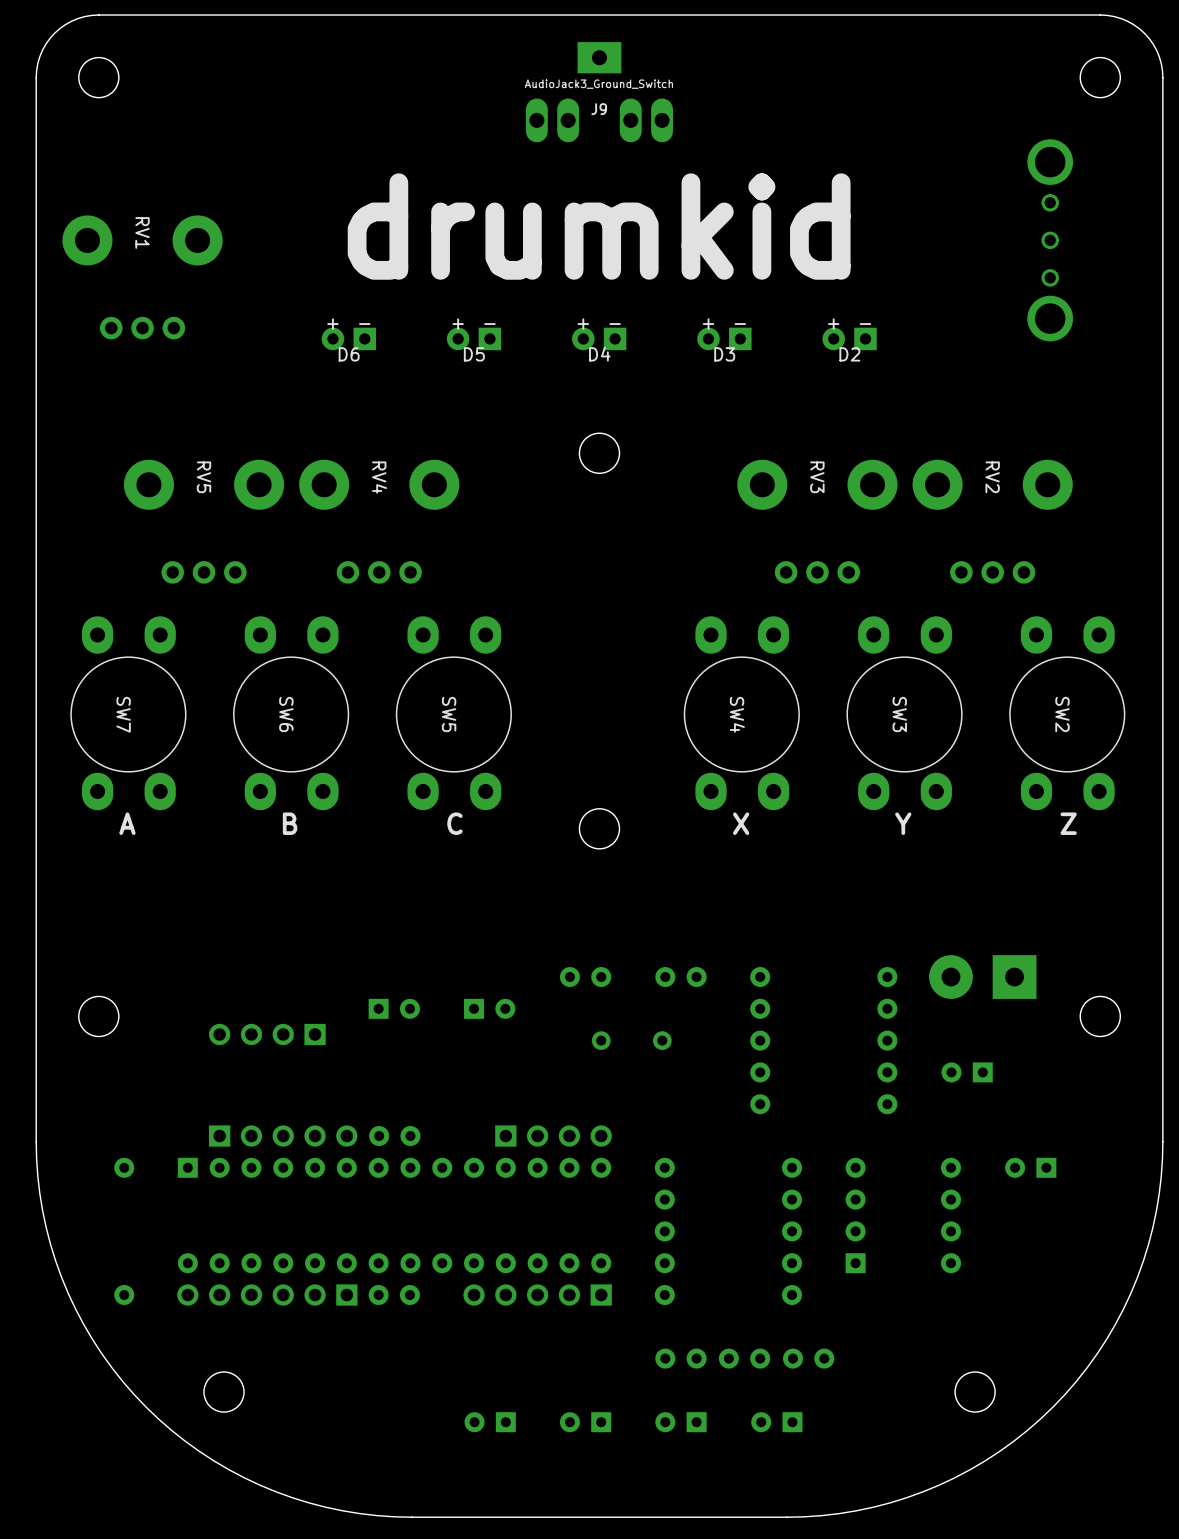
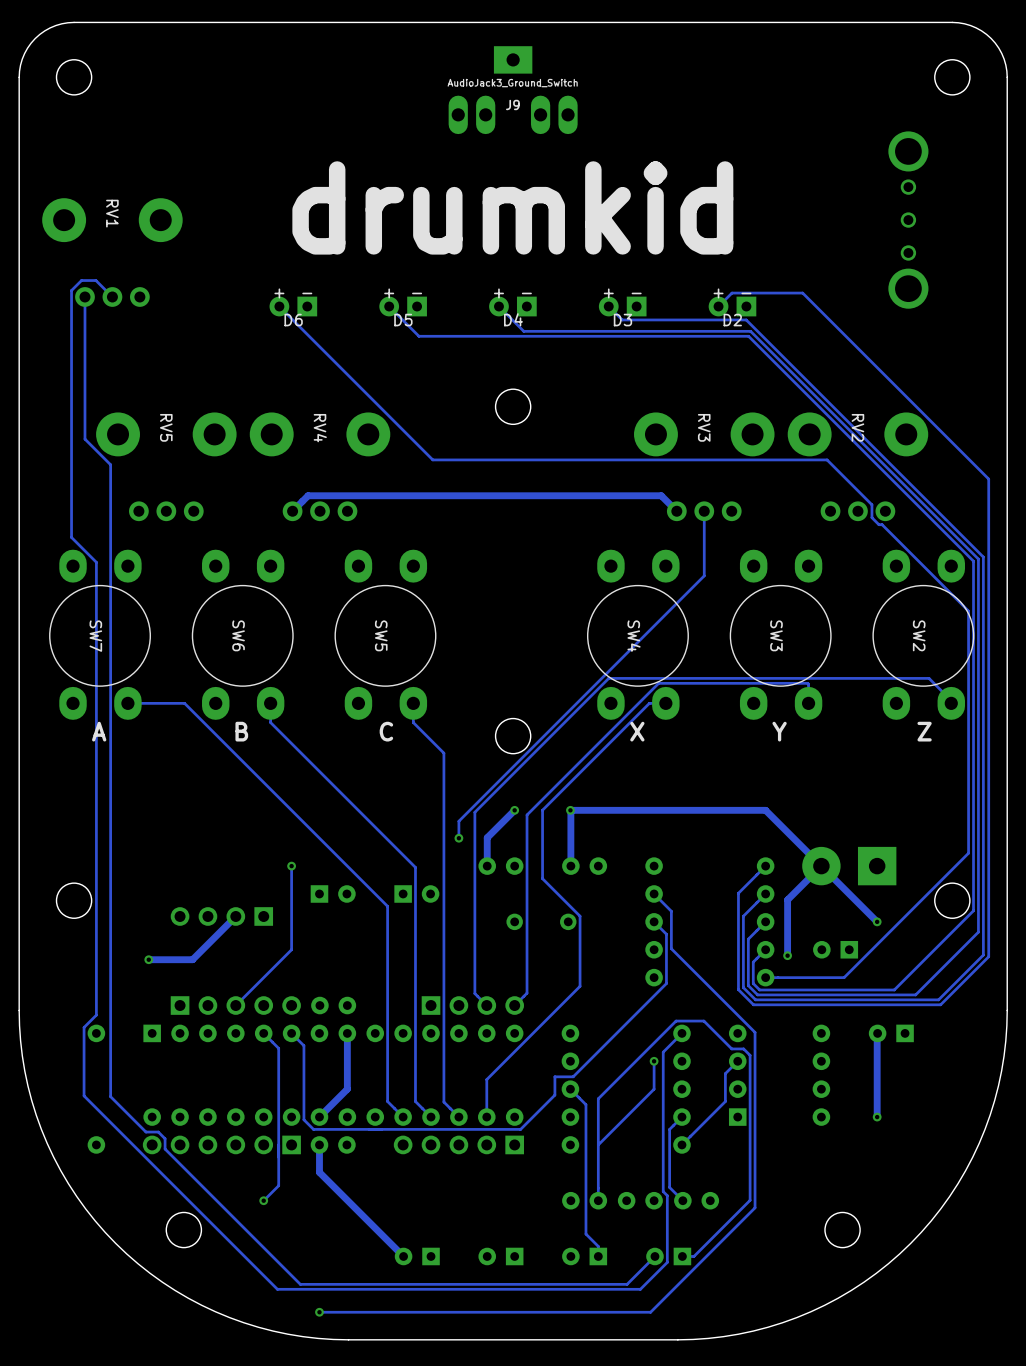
track: none -> (84, 296) (84, 439) (110, 464) (110, 1096) (145, 1132) (158, 1132) (165, 1138) (165, 1149) (300, 1284) (627, 1284) (654, 1256)
track: none -> (112, 296) (95, 280) (81, 280) (71, 290) (71, 537) (96, 562) (96, 1015) (84, 1027) (84, 1095) (277, 1289) (640, 1289) (667, 1262) (667, 1195) (663, 1191) (663, 1052) (681, 1033)
track: none -> (279, 306) (432, 459) (827, 459) (871, 504) (871, 517) (878, 524) (882, 524) (968, 611) (968, 853) (844, 977) (765, 977)
track: none -> (389, 306) (418, 336) (748, 336) (973, 561) (973, 910) (894, 989) (759, 989) (753, 983) (753, 962) (765, 949)
track: none -> (498, 306) (523, 331) (750, 331) (978, 559) (978, 932) (915, 994) (757, 994) (748, 985) (748, 939) (765, 921)
track: none -> (608, 306) (622, 319) (746, 319) (983, 557) (983, 955) (938, 999) (755, 999) (743, 987) (743, 916) (765, 893)
track: none -> (718, 306) (731, 293) (802, 293) (988, 479) (988, 956) (940, 1004) (753, 1004) (738, 989) (738, 893) (765, 866)
track: none -> (676, 511) (661, 495) (308, 495) (292, 511)
track: none -> (704, 511) (704, 575) (458, 821) (458, 838)
track: none -> (127, 703) (184, 703) (387, 906) (387, 1101) (403, 1117)
track: none -> (270, 703) (270, 722) (415, 867) (415, 1101) (431, 1117)
track: none -> (413, 703) (413, 722) (443, 753) (443, 1102) (458, 1117)
track: none -> (665, 703) (649, 703) (542, 810) (542, 878) (580, 916) (580, 986) (486, 1079) (486, 1117)
track: none -> (808, 703) (807, 683) (658, 683) (527, 814) (527, 993) (514, 1005)
track: none -> (951, 703) (951, 700) (929, 678) (608, 678) (474, 812) (474, 993) (486, 1005)
track: none -> (514, 810) (487, 837) (487, 866)
via: none -> (514, 810)
via: none -> (570, 810)
via: none -> (458, 838)
track: none -> (291, 866) (291, 949) (235, 1005)
via: none -> (291, 866)
track: none -> (570, 866) (570, 810) (765, 810) (877, 921)
track: none -> (821, 866) (787, 899) (787, 955)
track: none -> (654, 893) (671, 911) (671, 948) (755, 1032) (755, 1207) (650, 1312) (319, 1312)
track: none -> (235, 916) (192, 959) (148, 959)
track: none -> (654, 921) (666, 934) (666, 983) (573, 1076) (554, 1076) (554, 1095) (520, 1129) (313, 1129) (303, 1119) (303, 1045) (291, 1033)
via: none -> (877, 921)
via: none -> (787, 955)
via: none -> (148, 959)
track: none -> (263, 1033) (278, 1048) (278, 1185) (263, 1200)
track: none -> (347, 1033) (347, 1089) (319, 1117)
track: none -> (877, 1033) (877, 1117)
track: none -> (654, 1061) (654, 1089) (598, 1144)
via: none -> (654, 1061)
track: none -> (737, 1061) (725, 1073) (725, 1101) (681, 1144)
track: none -> (570, 1089) (585, 1104) (585, 1234) (598, 1246) (598, 1256)
track: none -> (681, 1117) (669, 1129) (669, 1187) (682, 1200)
via: none -> (877, 1117)
track: none -> (319, 1144) (319, 1172) (403, 1256)
via: none -> (263, 1200)
track: none -> (598, 1200) (598, 1098) (676, 1021) (703, 1021) (731, 1048) (743, 1048) (750, 1055) (750, 1200) (693, 1256) (682, 1256)
via: none -> (319, 1312)

